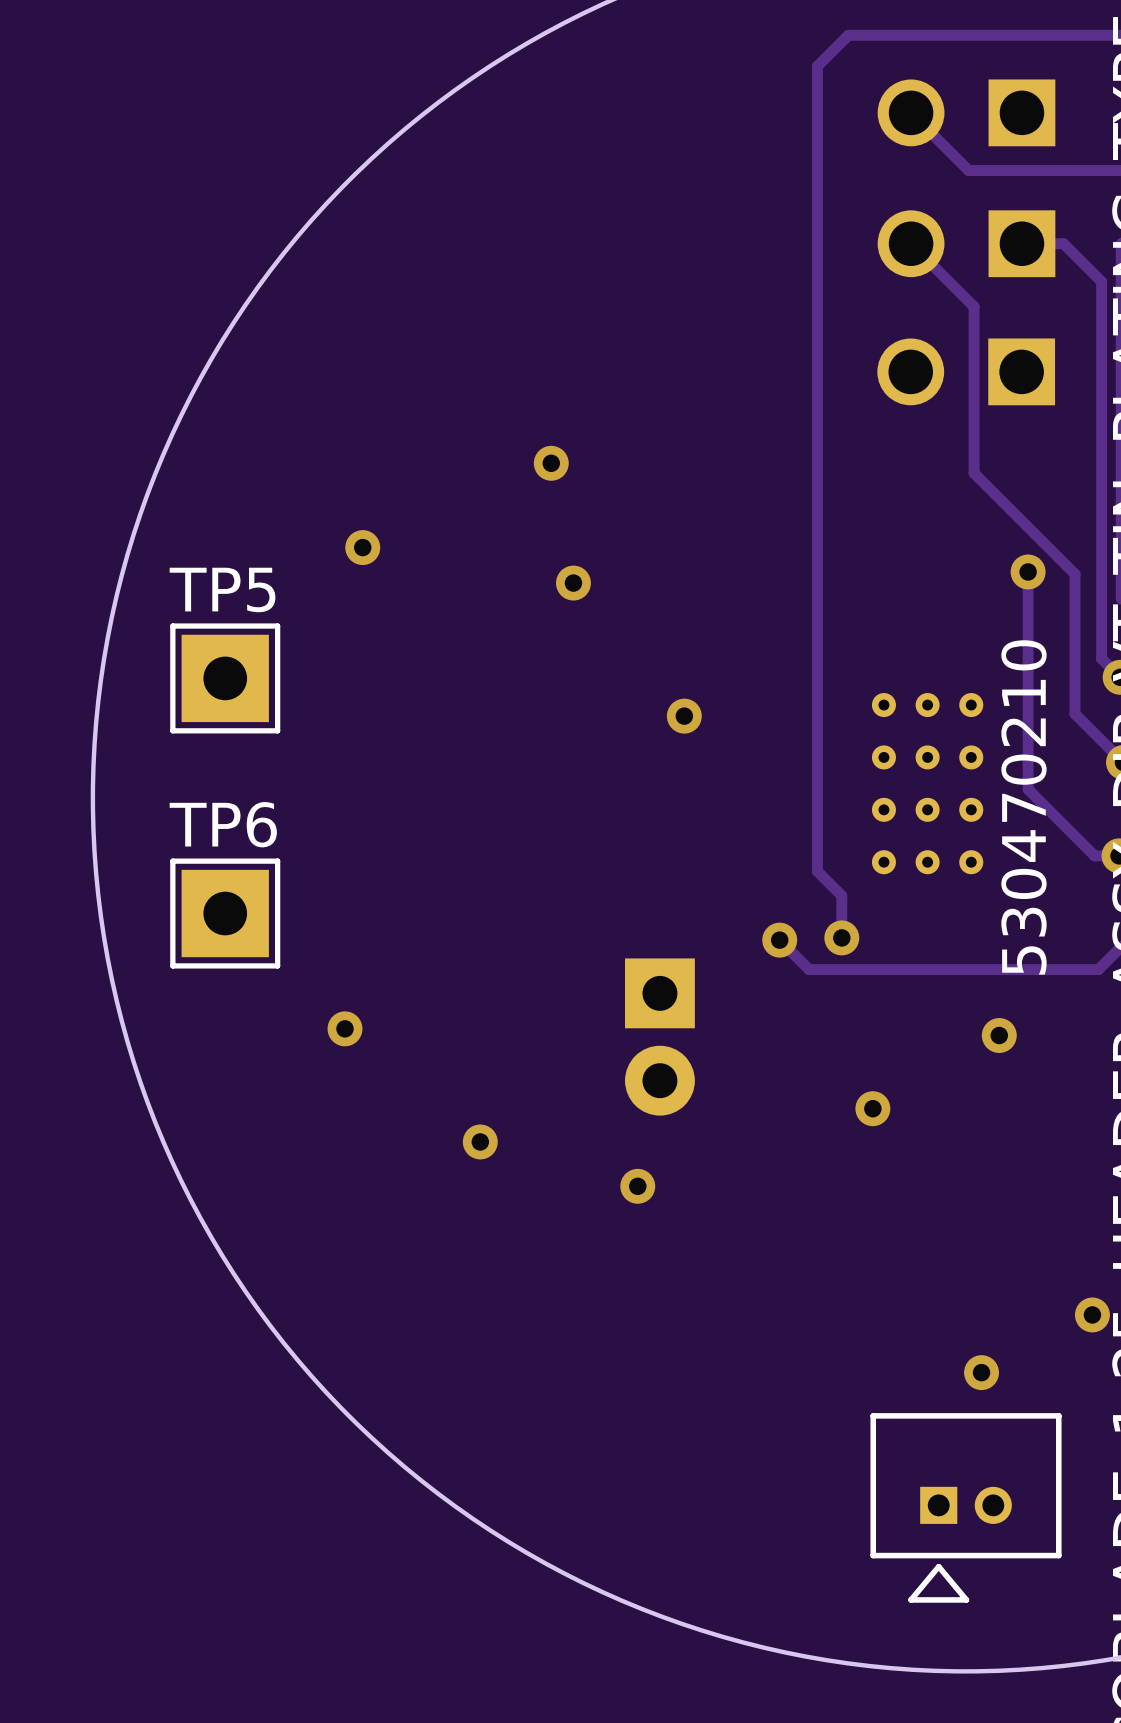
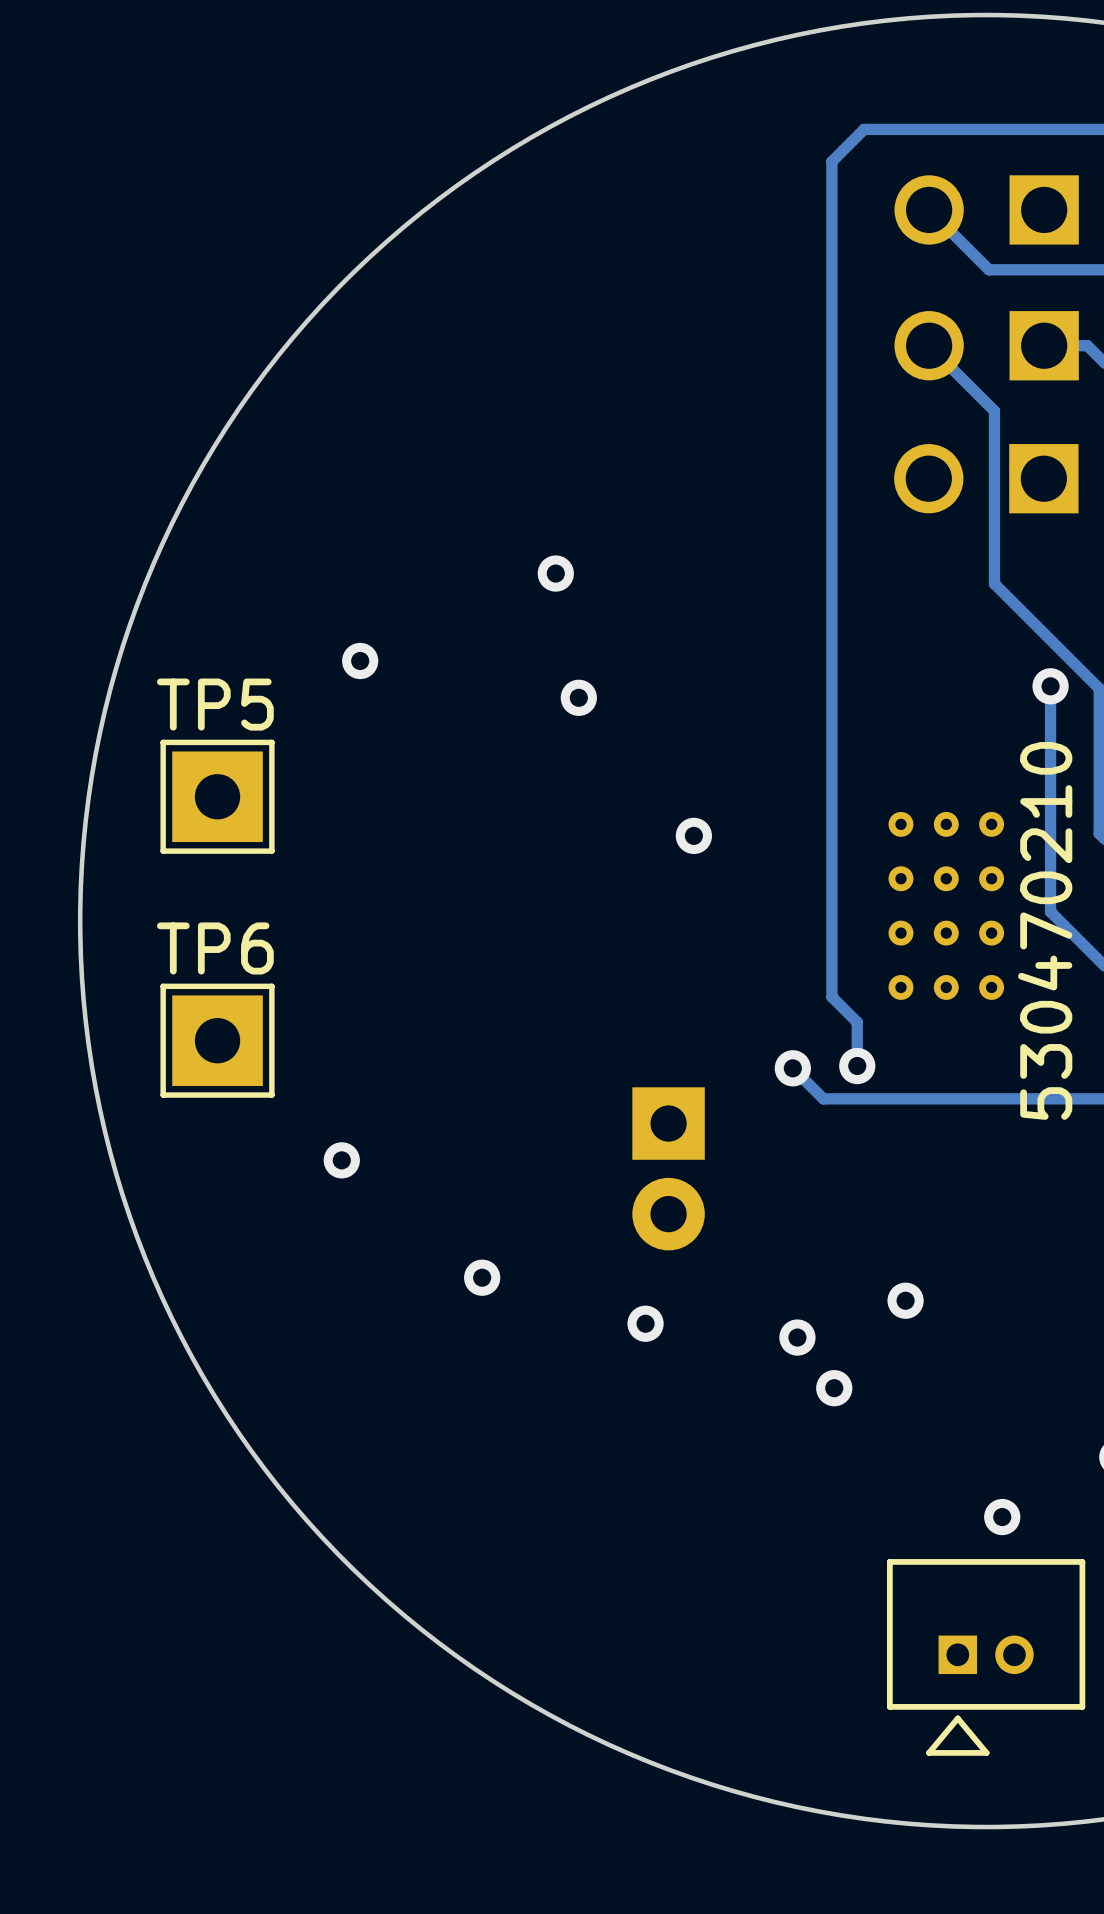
via: (999, 1035) -> none
via position: (872, 1108) -> (905, 1300)
via: none -> (797, 1337)
via: none -> (834, 1388)

